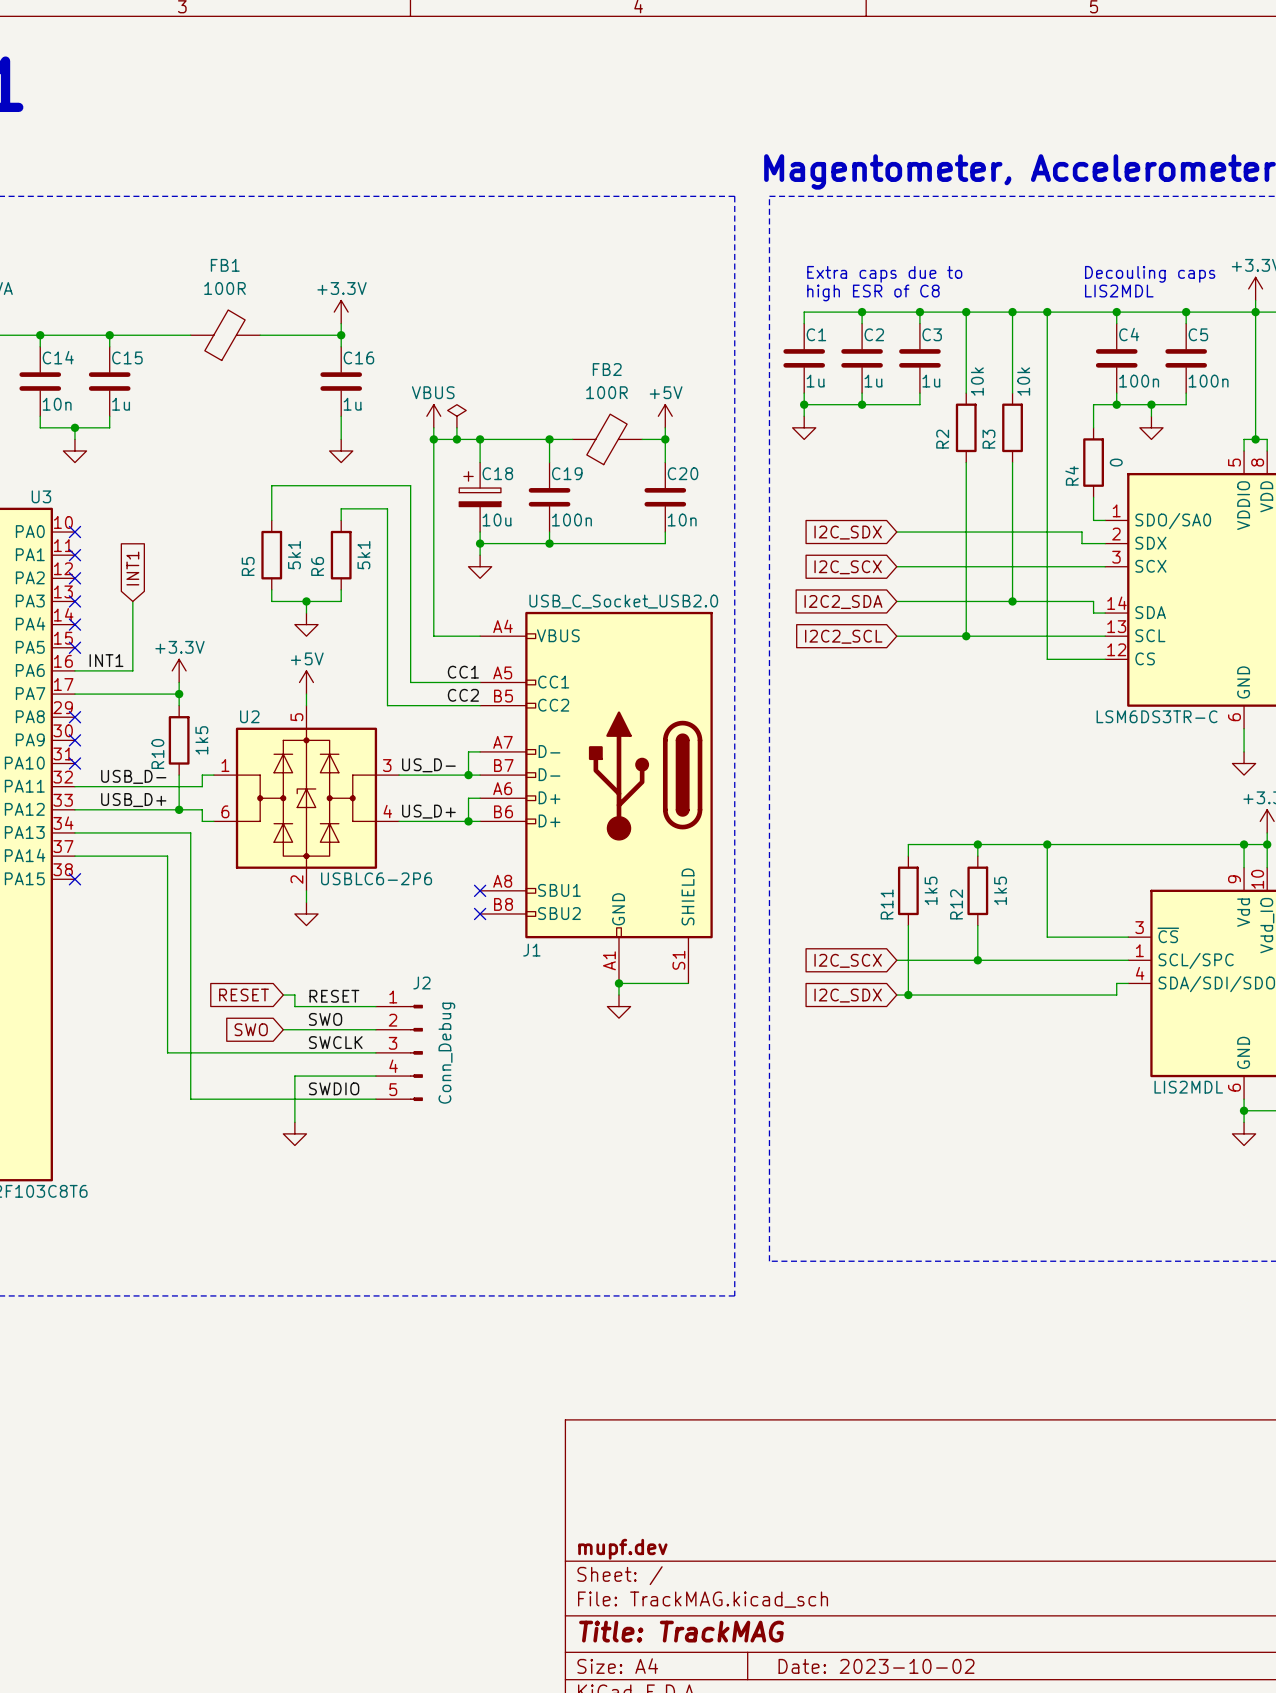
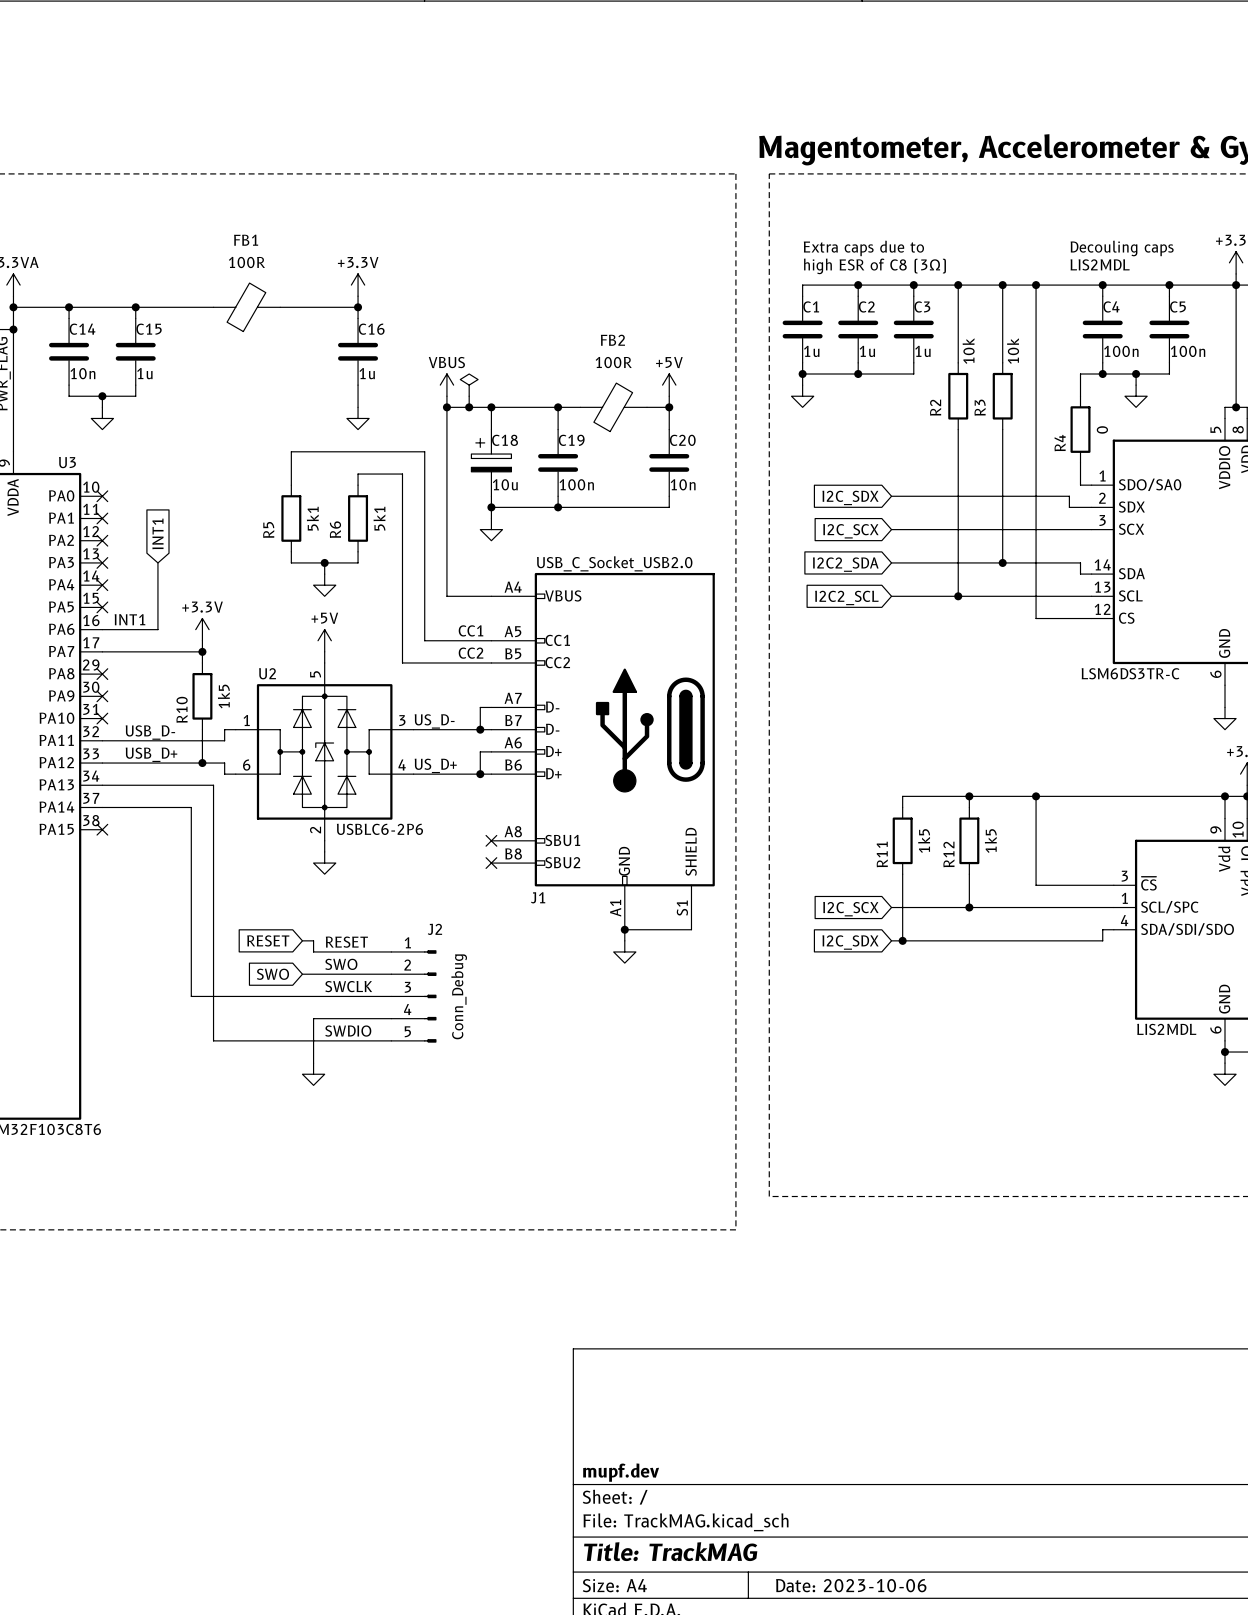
text: high ESR of C8 (873, 292) -> high ESR of C8 (3Ω) (874, 266)
title block: Date: 2023-10-02 (876, 1666) -> Date: 2023-10-06 (851, 1585)

